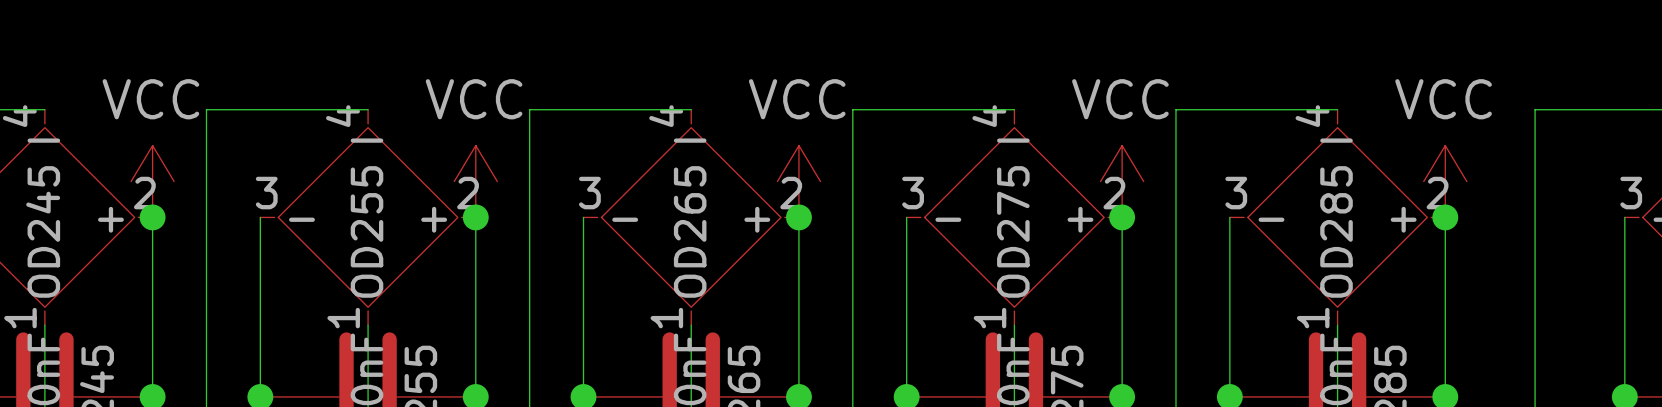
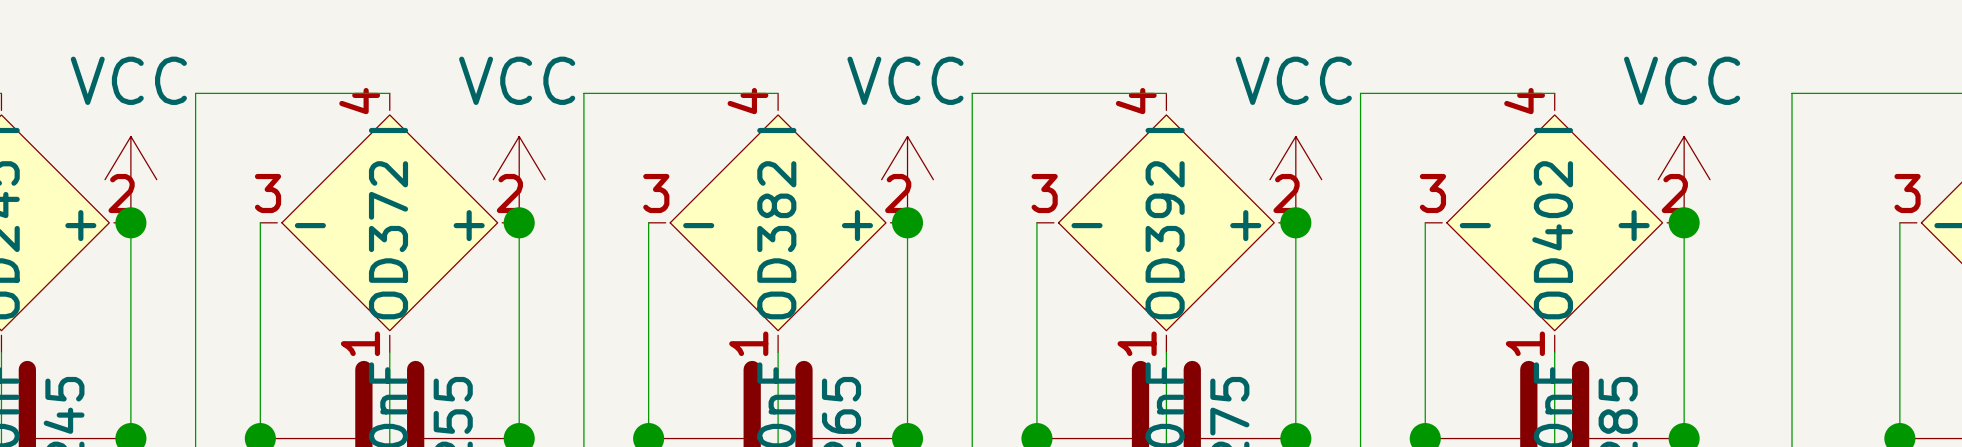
D255 name: D255 (367, 216) -> D372 (388, 222)
D265 name: D265 (690, 216) -> D382 (776, 222)
D275 name: D275 (1013, 216) -> D392 (1165, 222)
D285 name: D285 (1336, 216) -> D402 (1552, 222)

